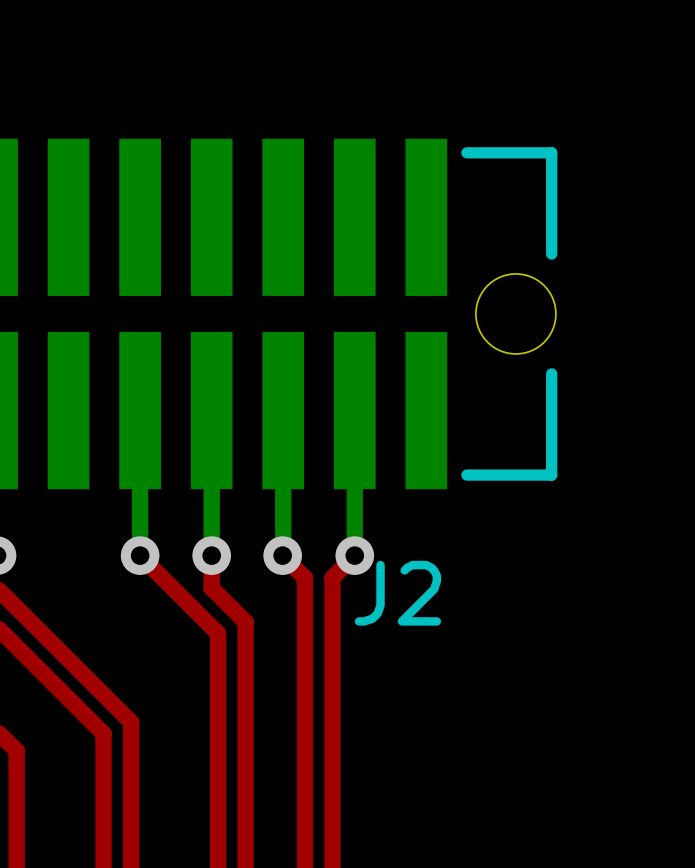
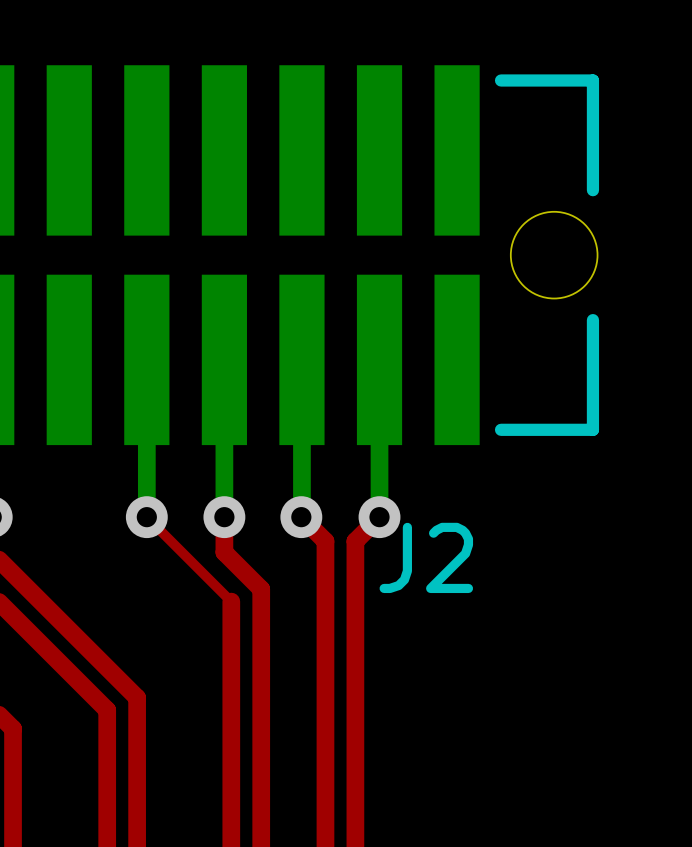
top track width: thick (140, 555) (218, 633) -> thin (146, 517) (231, 601)

